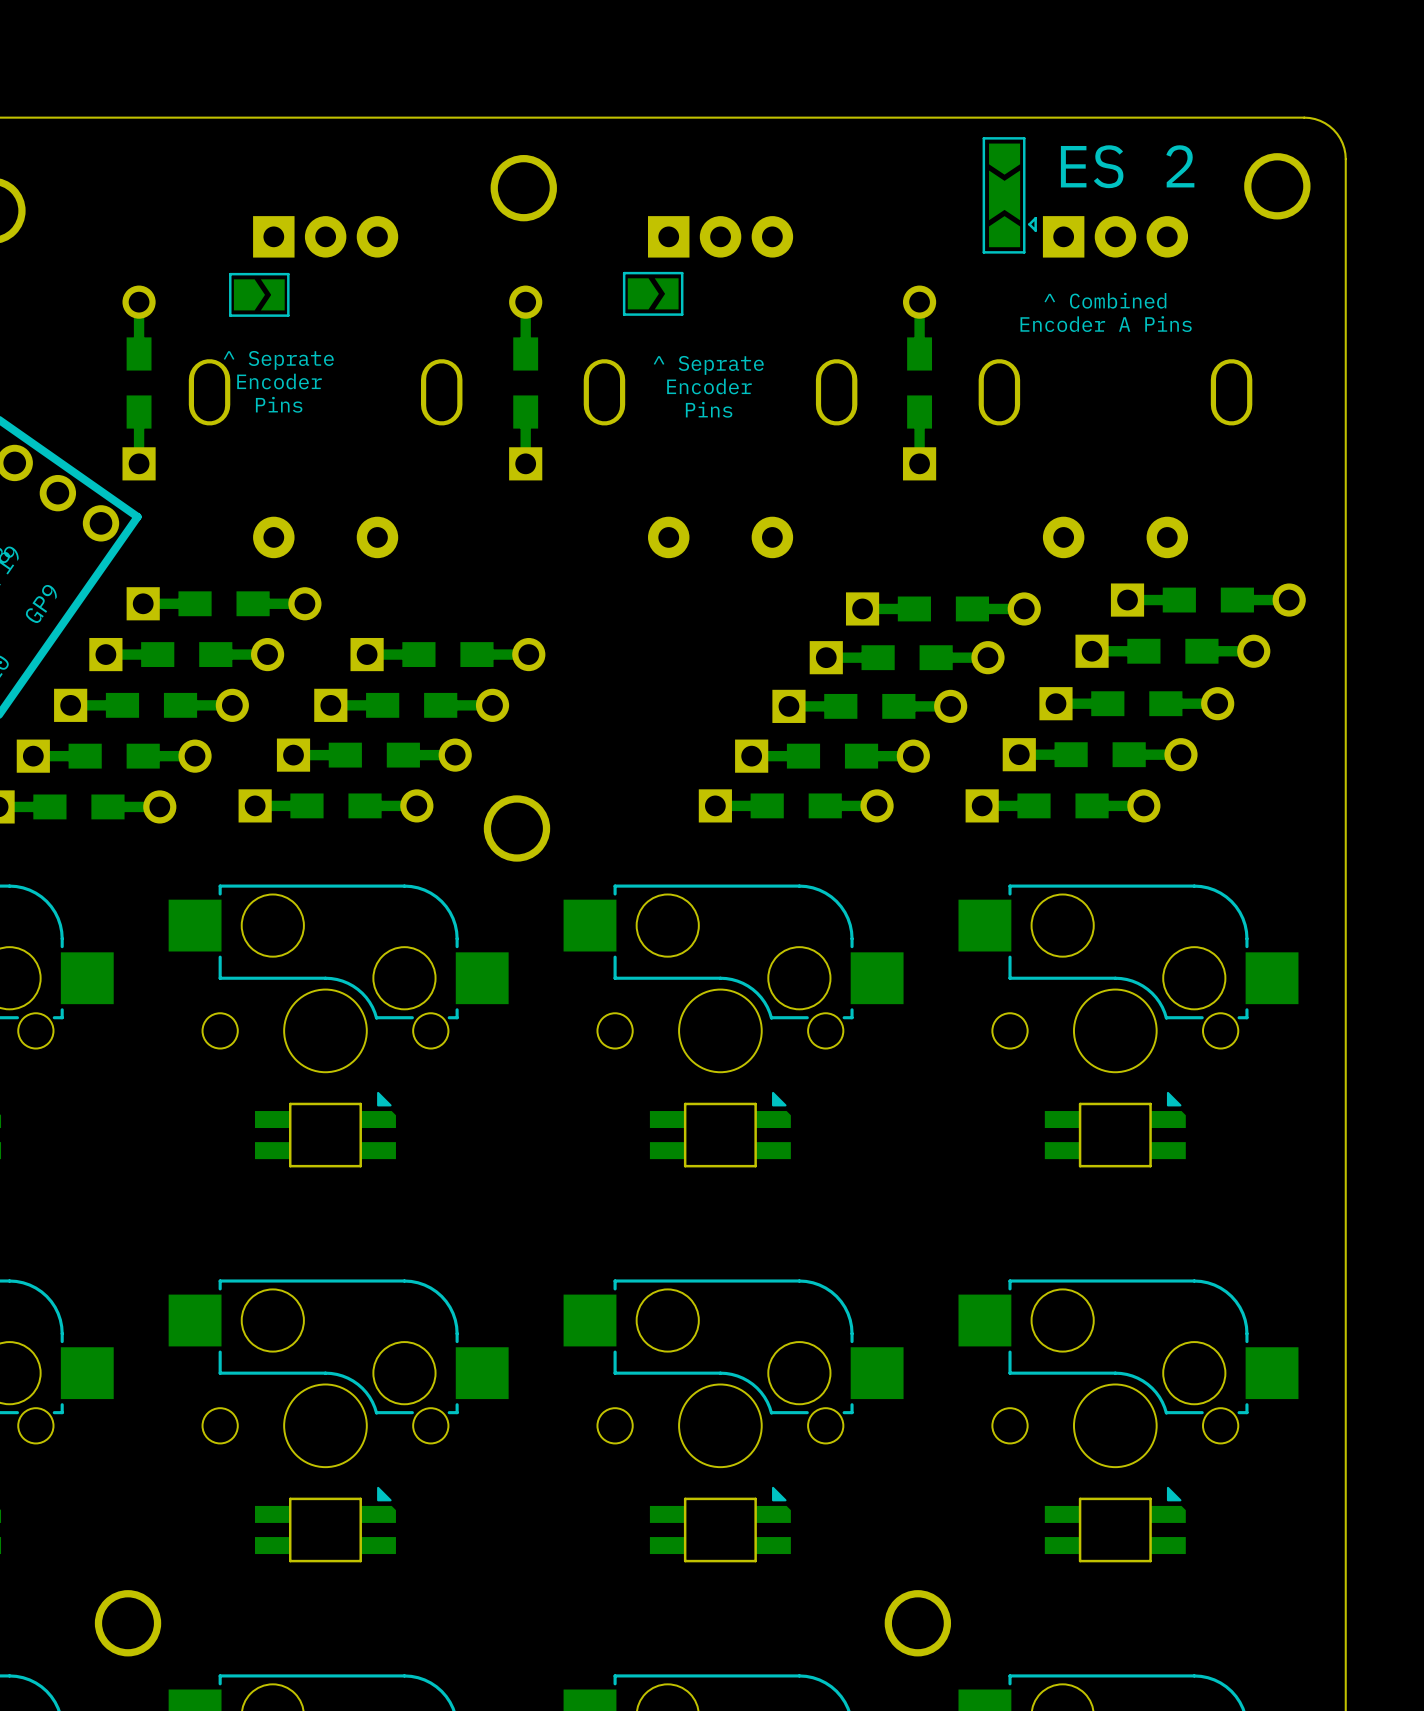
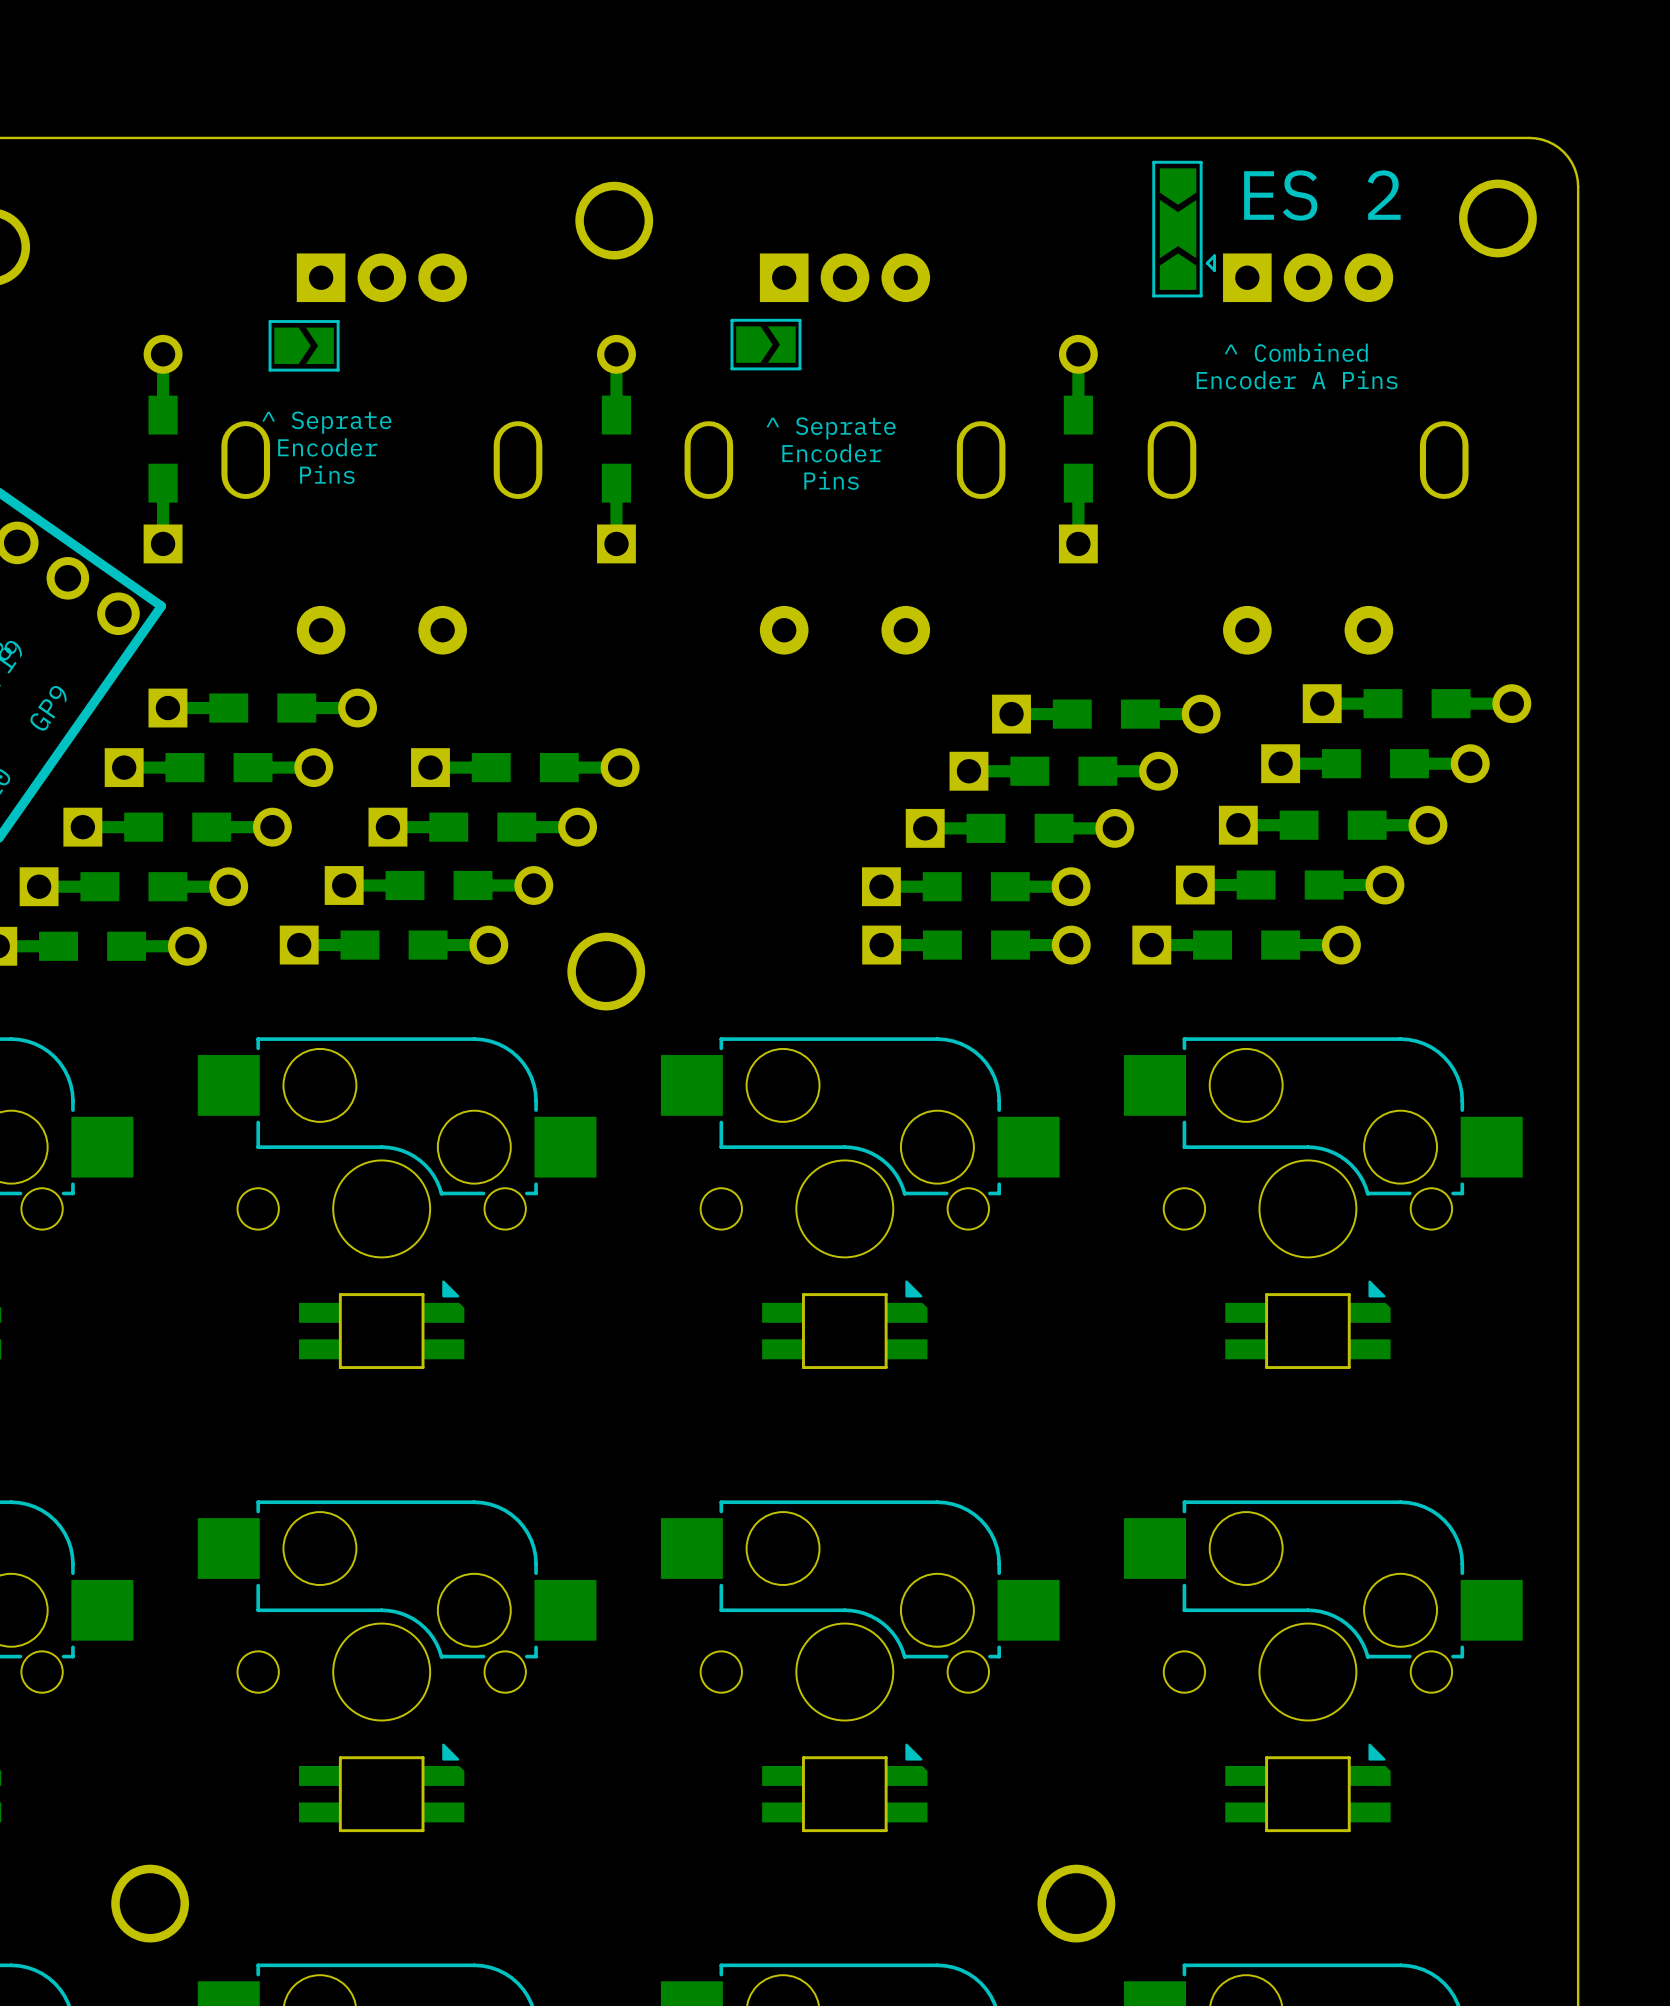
part position: (796, 805) -> (976, 945)

